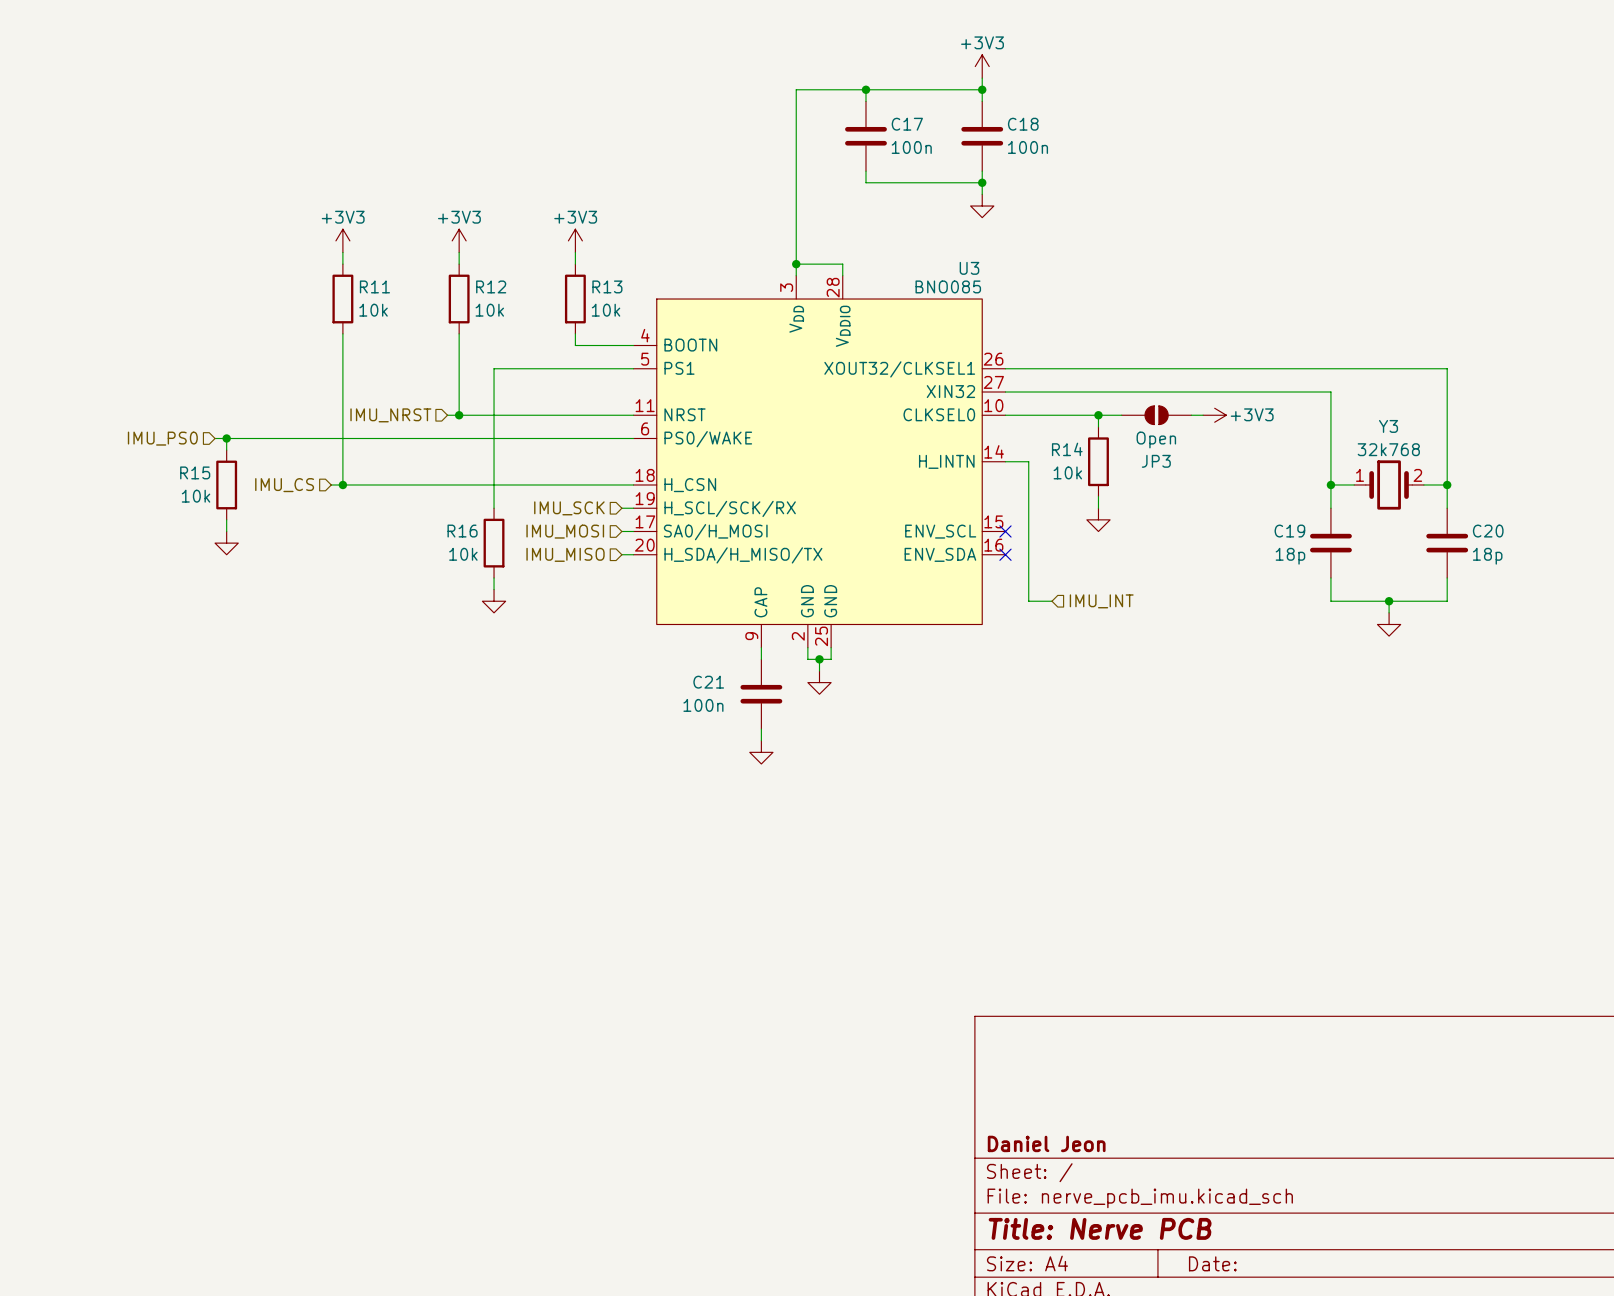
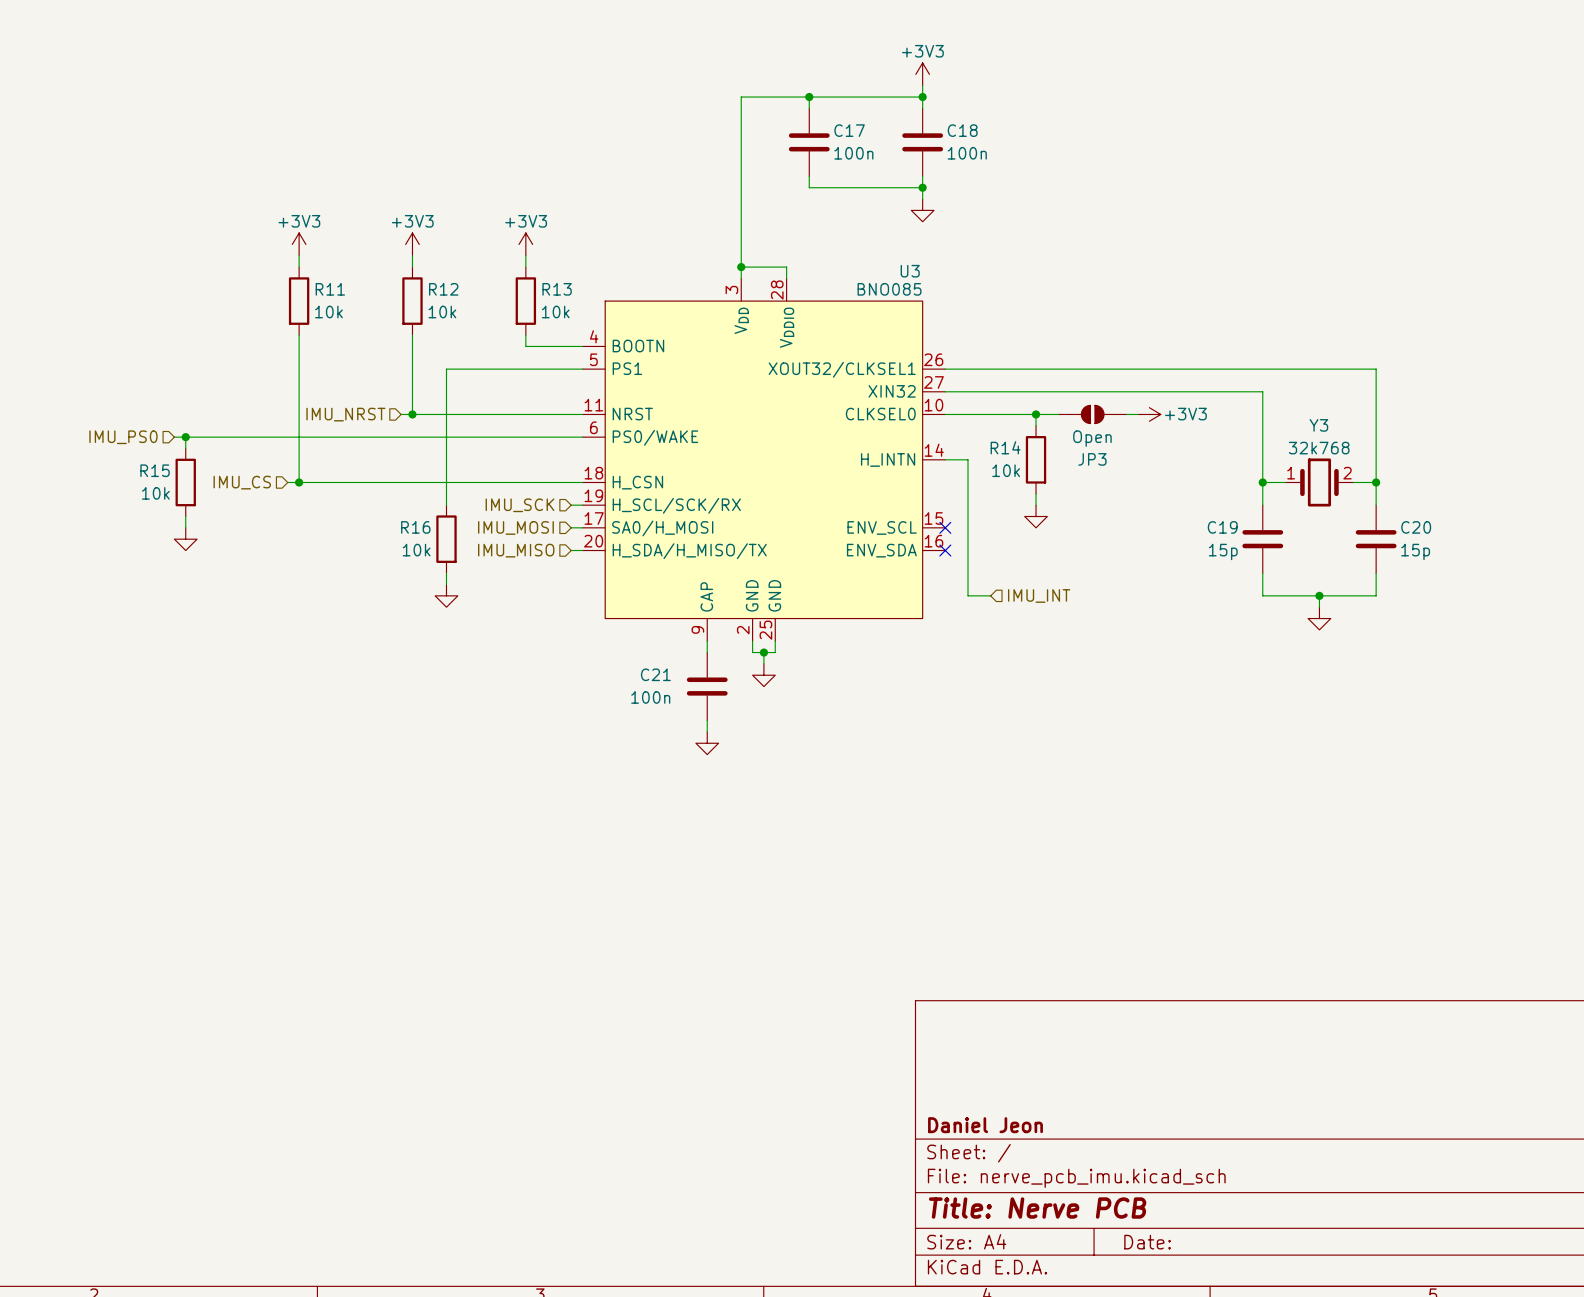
C19 value: 18p (1290, 556) -> 15p (1223, 551)
C20 value: 18p (1487, 556) -> 15p (1415, 551)

